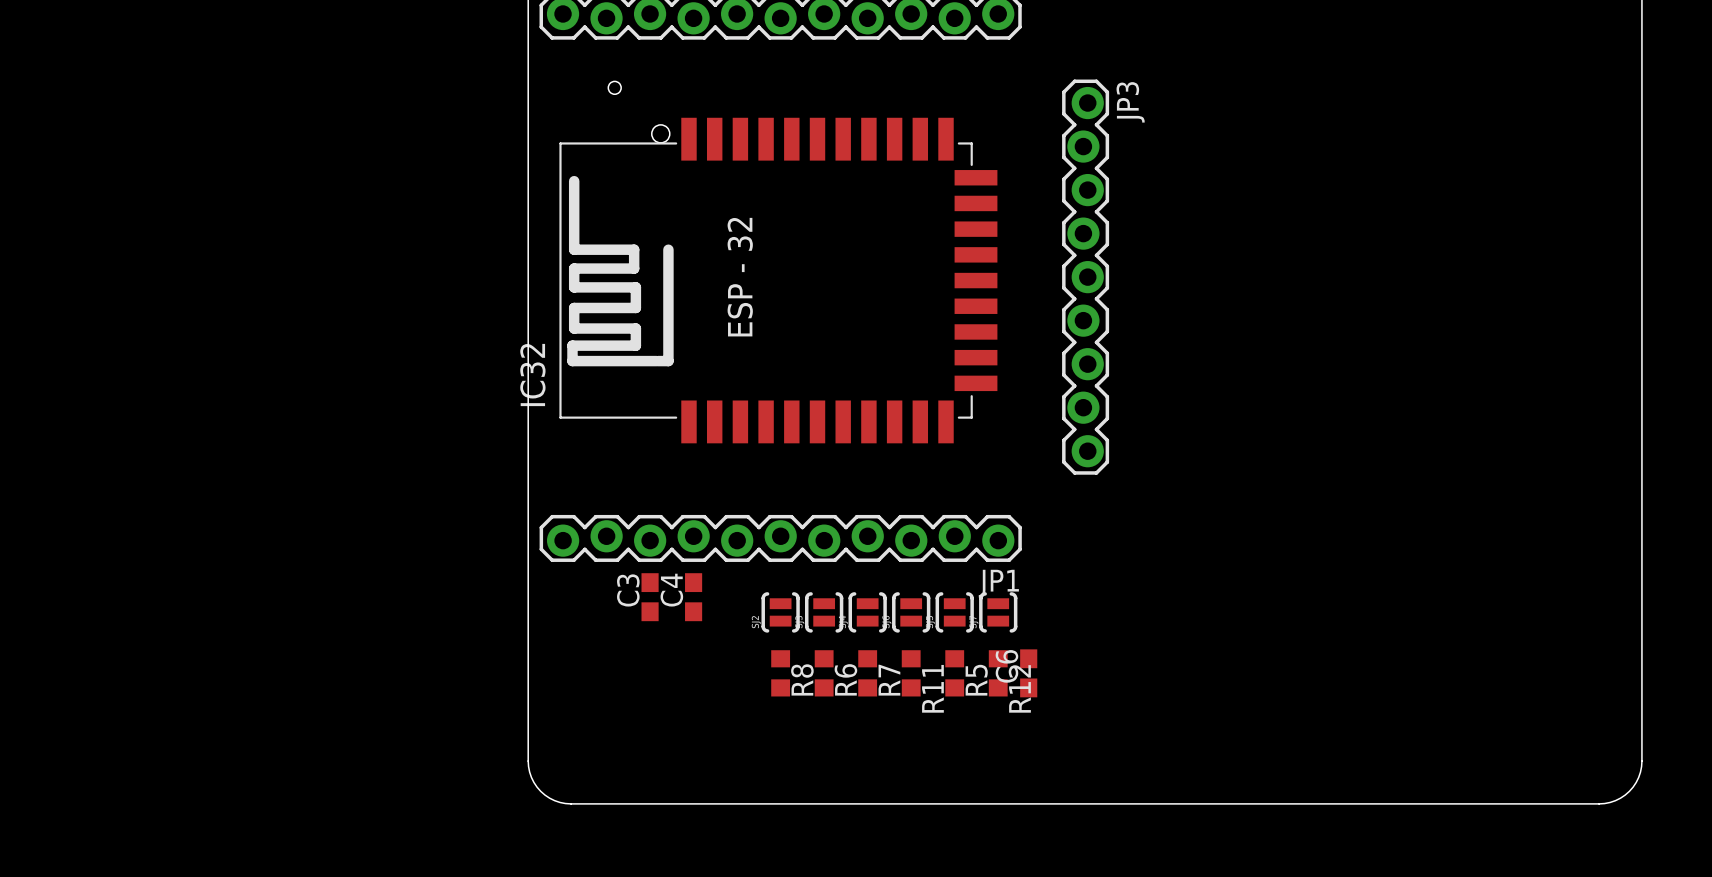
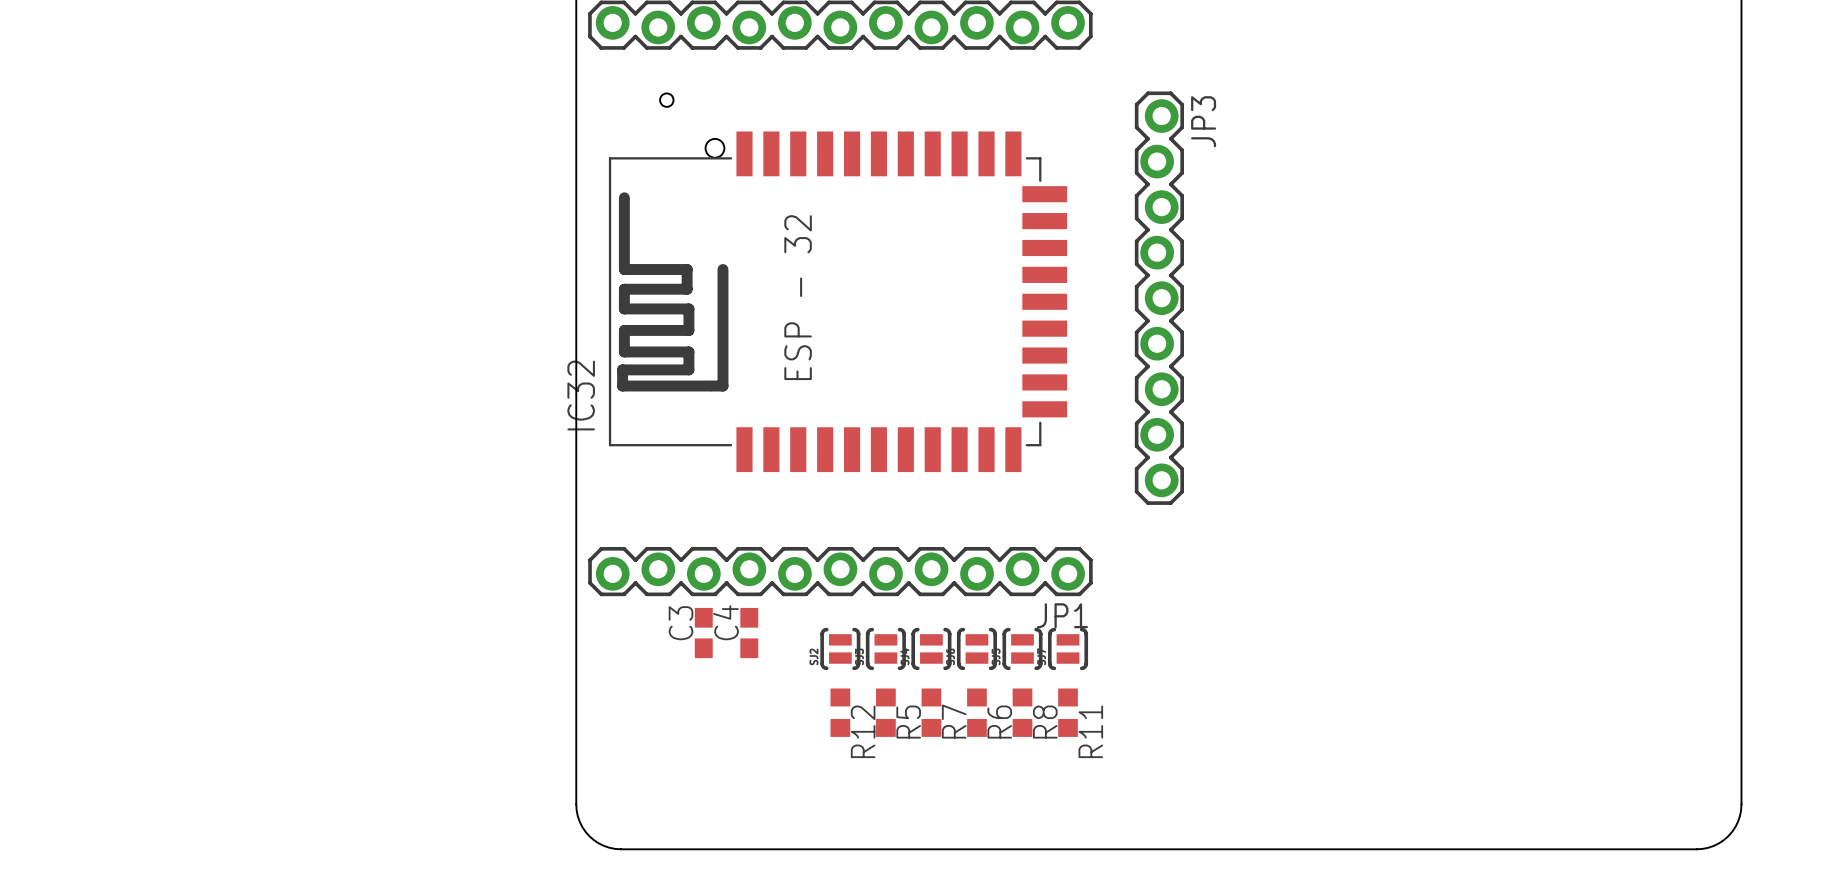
C6: (1028, 673) -> none
R8 name: R8 (802, 679) -> R12 (863, 731)
R6 name: R6 (845, 679) -> R5 (908, 722)
R5 name: R5 (976, 680) -> R8 (1045, 722)
R11 name: R11 (932, 688) -> R6 (999, 722)
R12 name: R12 (1019, 688) -> R11 (1090, 731)

